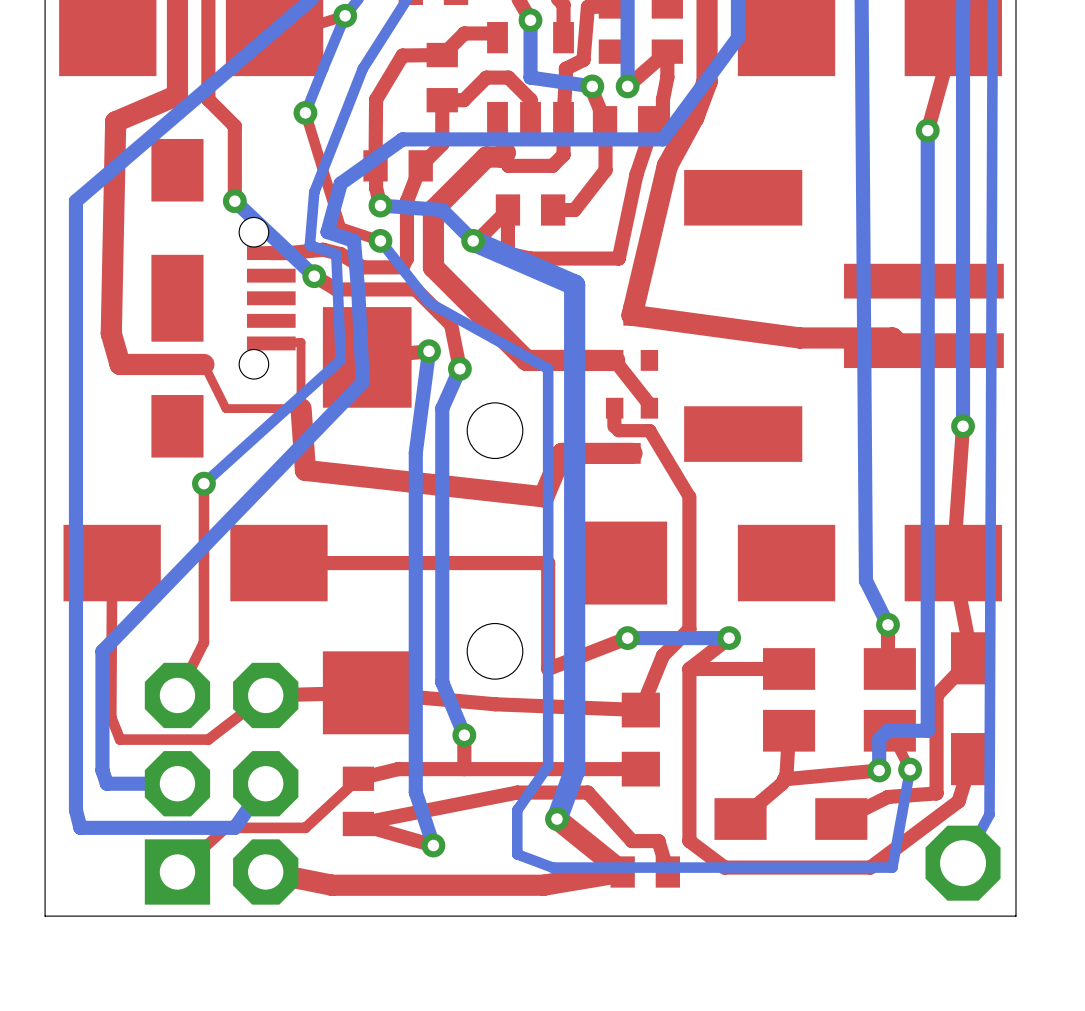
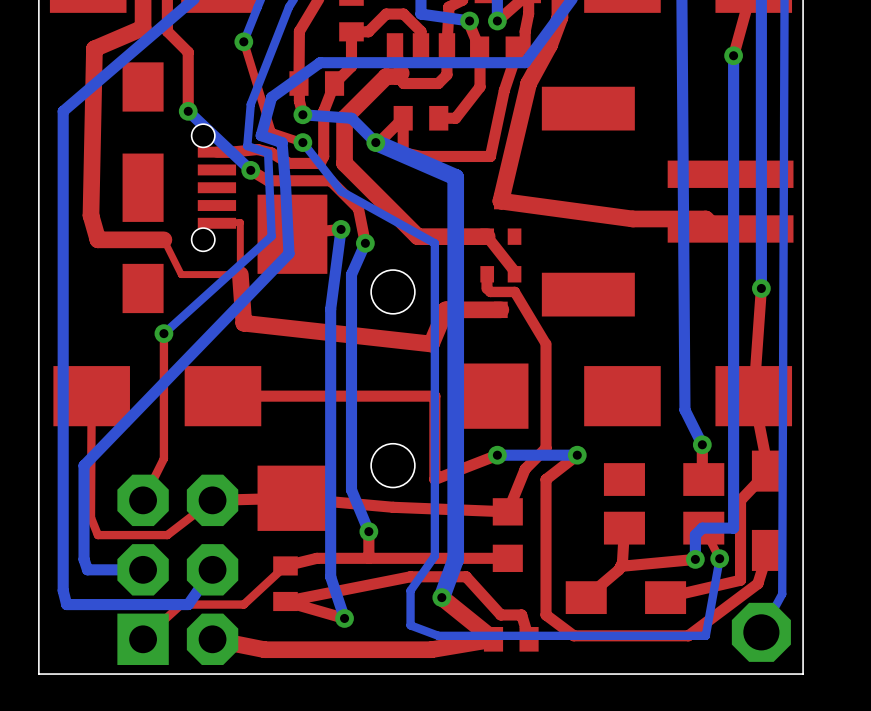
top track: (789, 668) (689, 668) -> none
top track: (936, 793) (888, 796) (861, 810) -> (740, 577) (740, 580) (665, 597)

